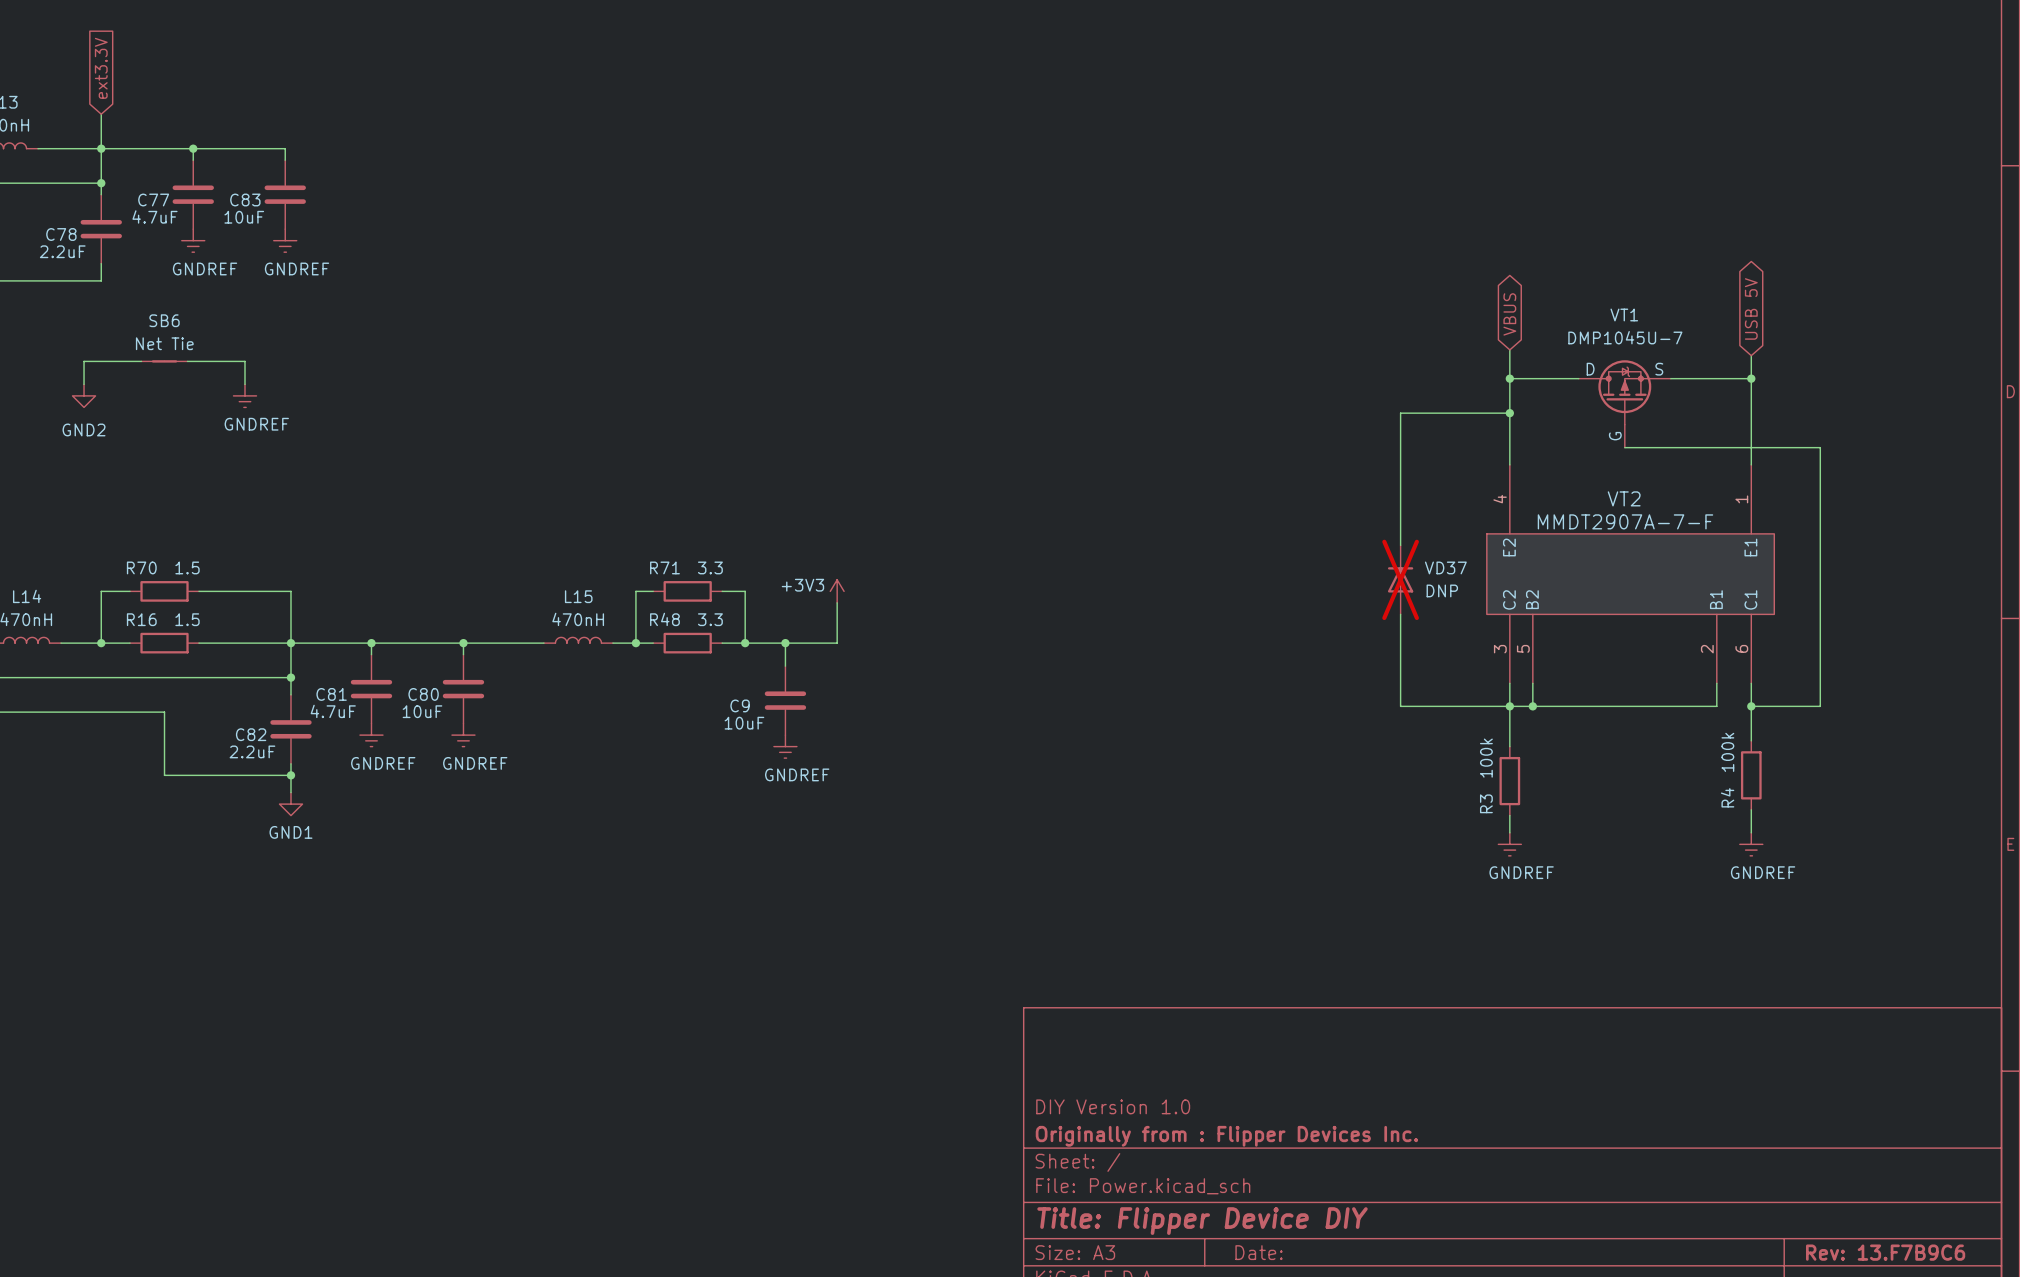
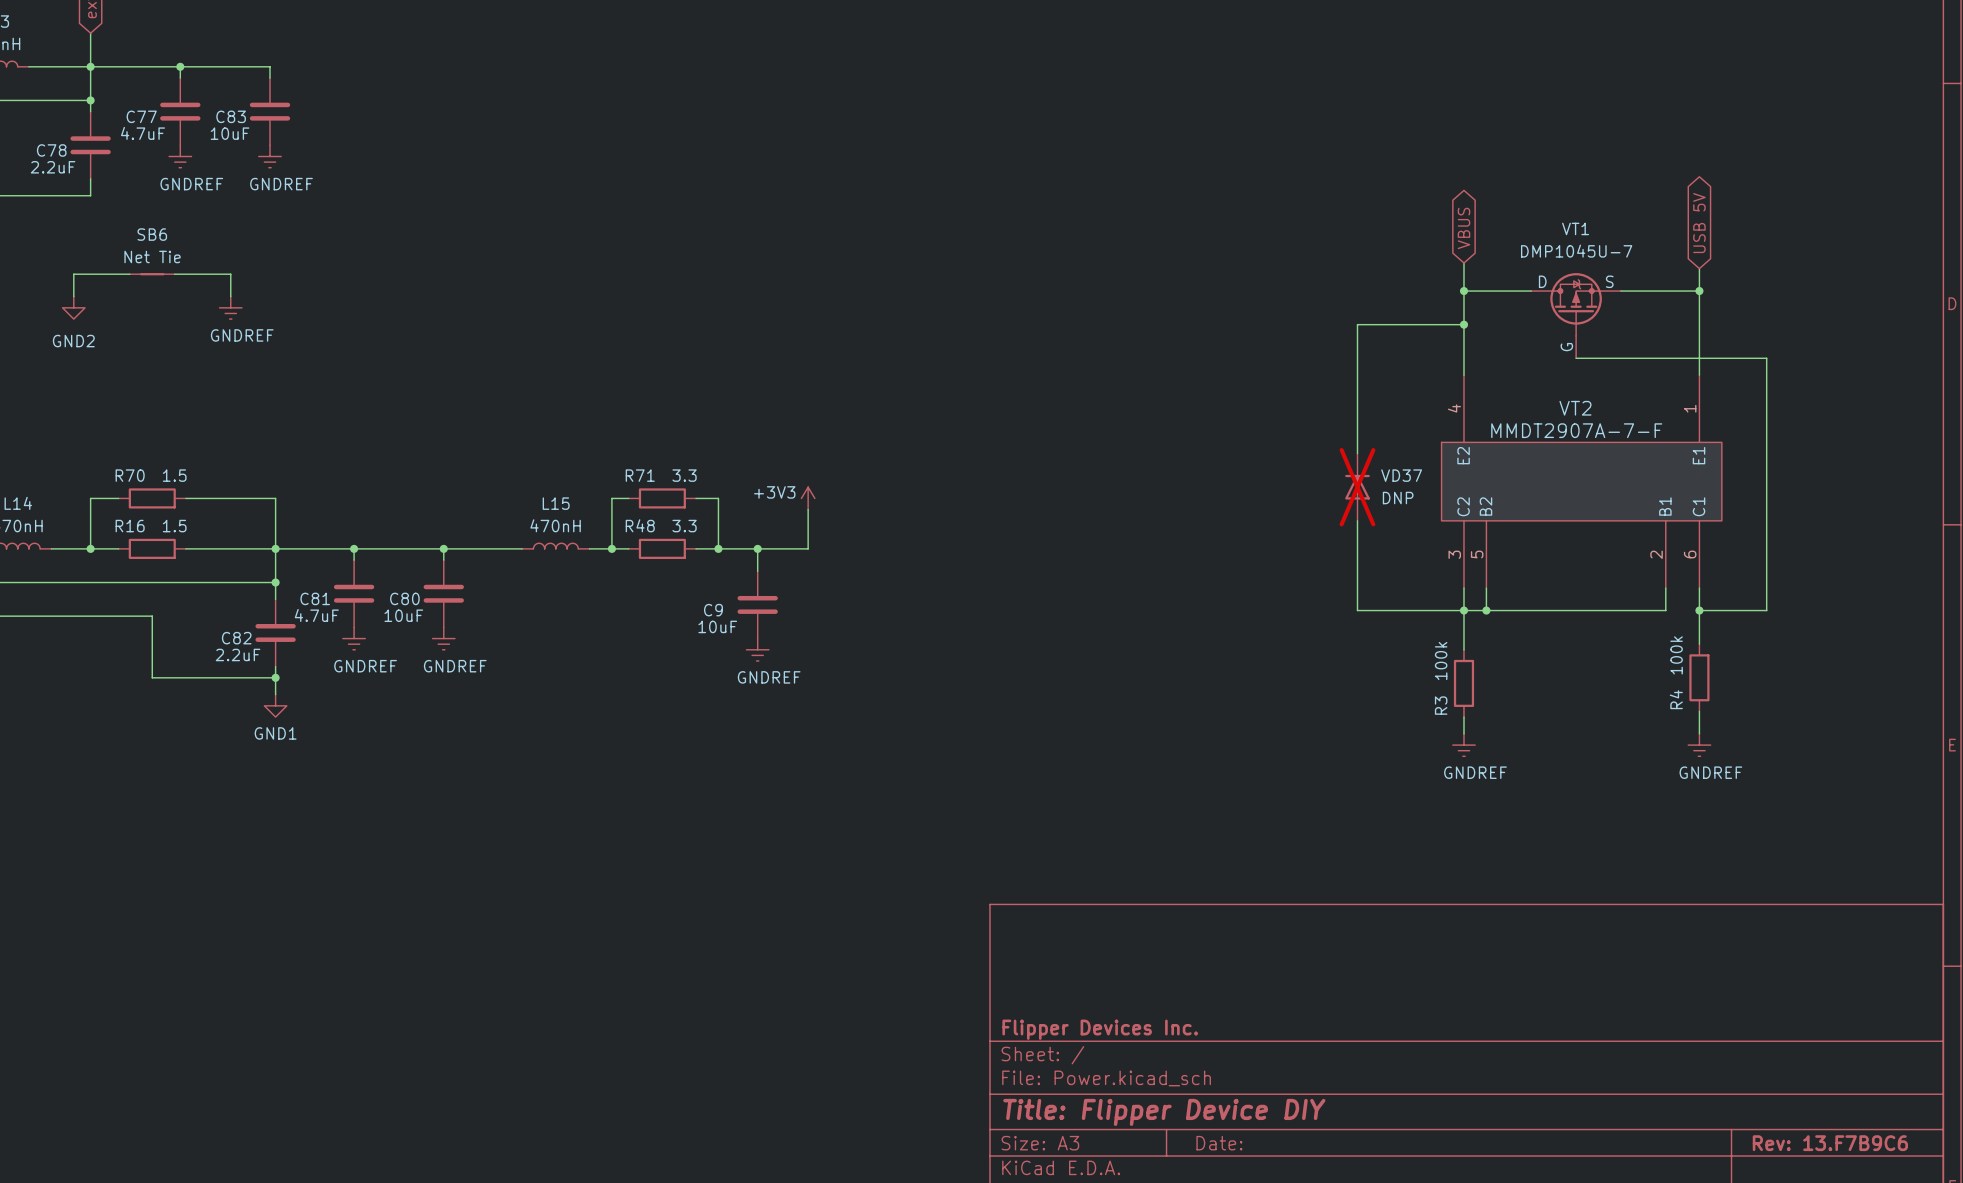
title block: DIY Version 1.0 (1113, 1106) -> none
title block: Originally from : Flipper Devices Inc. (1226, 1136) -> Flipper Devices Inc. (1100, 1029)

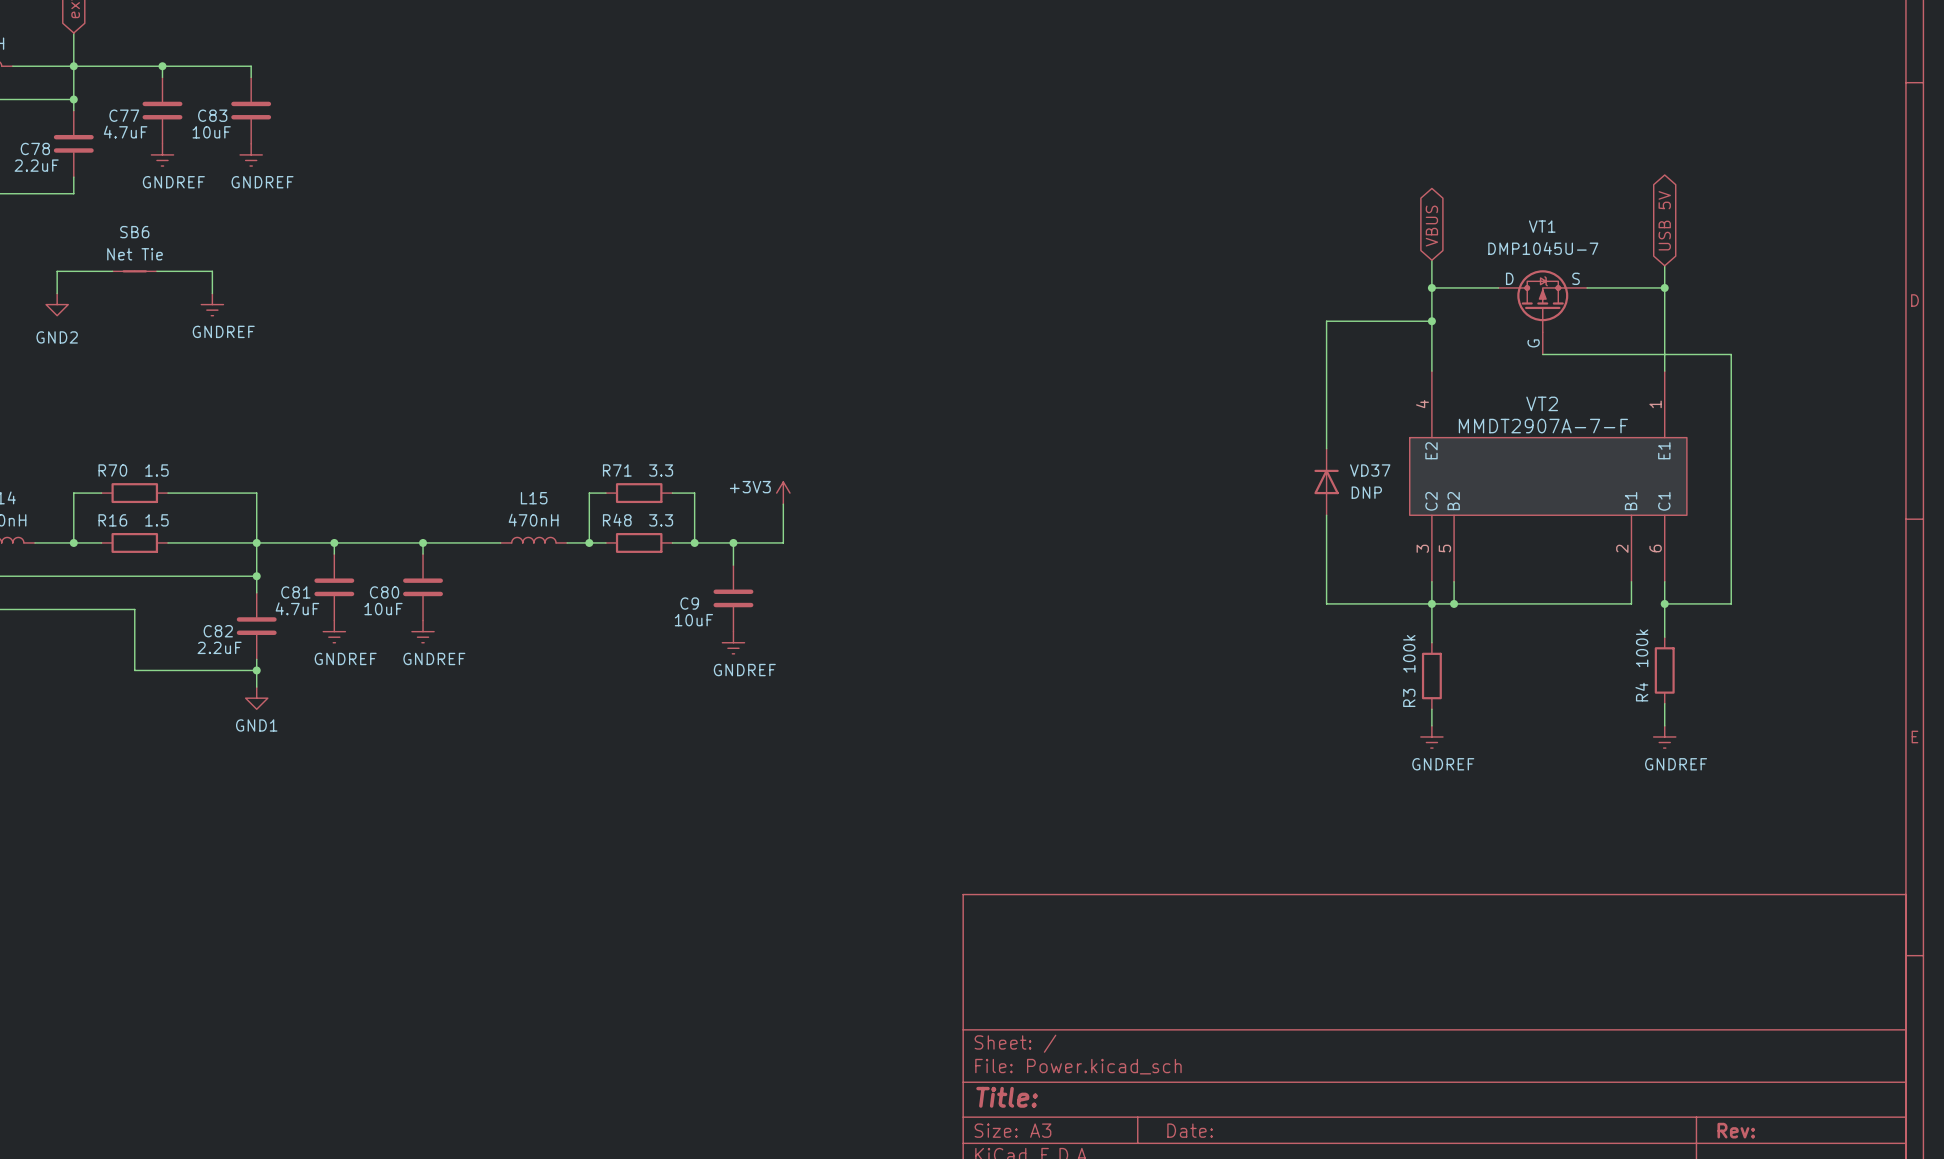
VD37 do-not-place cross: (1357, 487) -> none
title block: Flipper Devices Inc. (1100, 1029) -> none
title block: Title: Flipper Device DIY (1164, 1112) -> Title: (1007, 1097)
title block: Rev: 13.F7B9C6 (1830, 1143) -> Rev: (1736, 1130)

